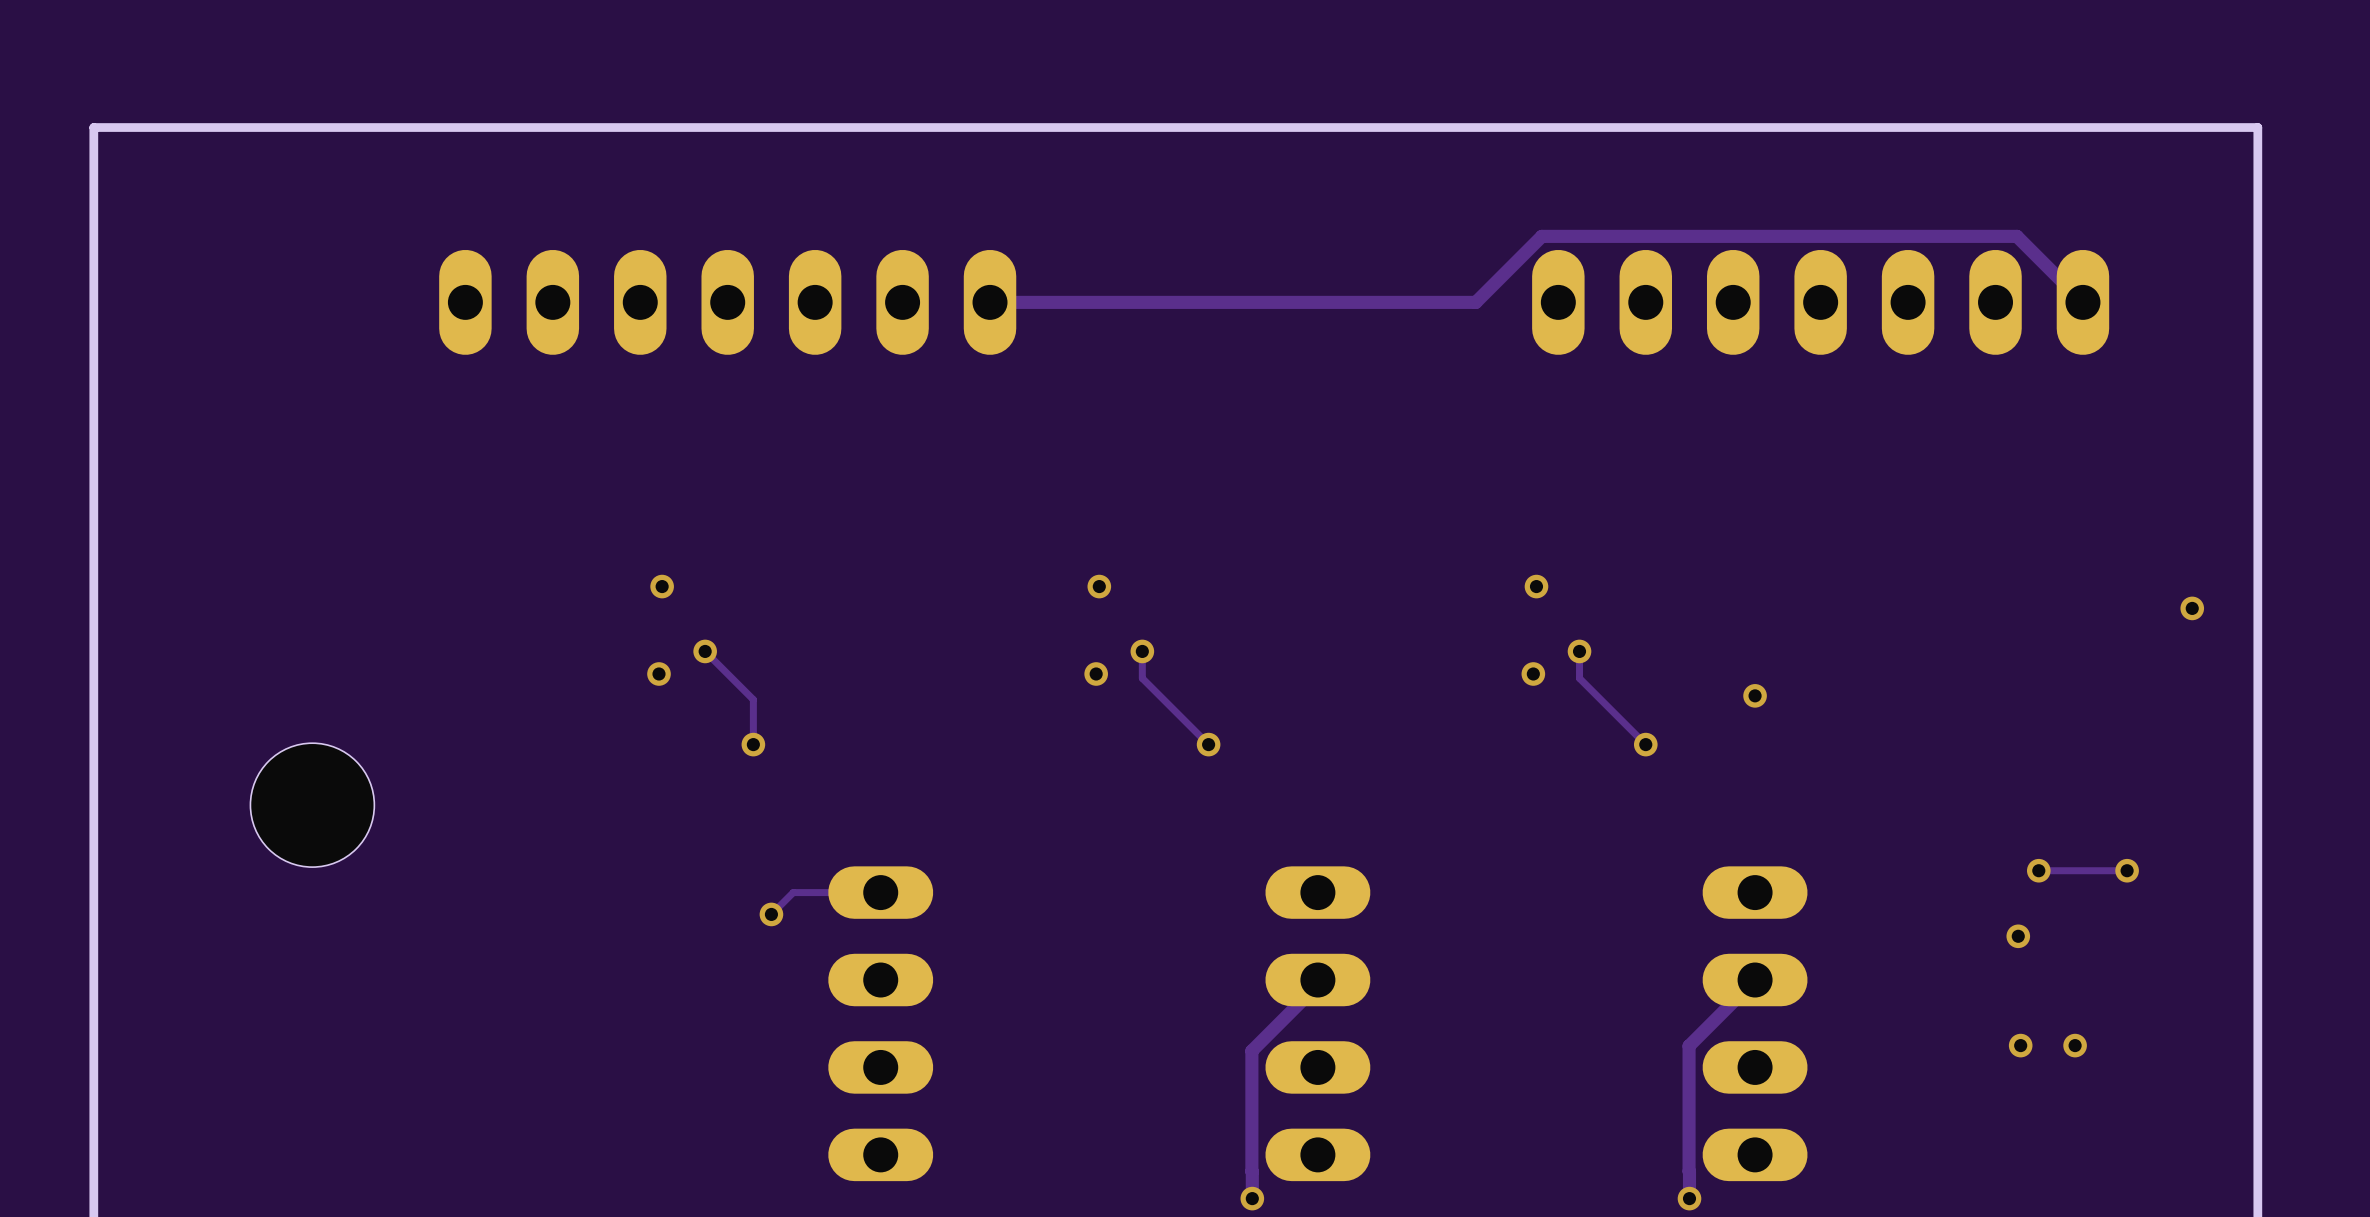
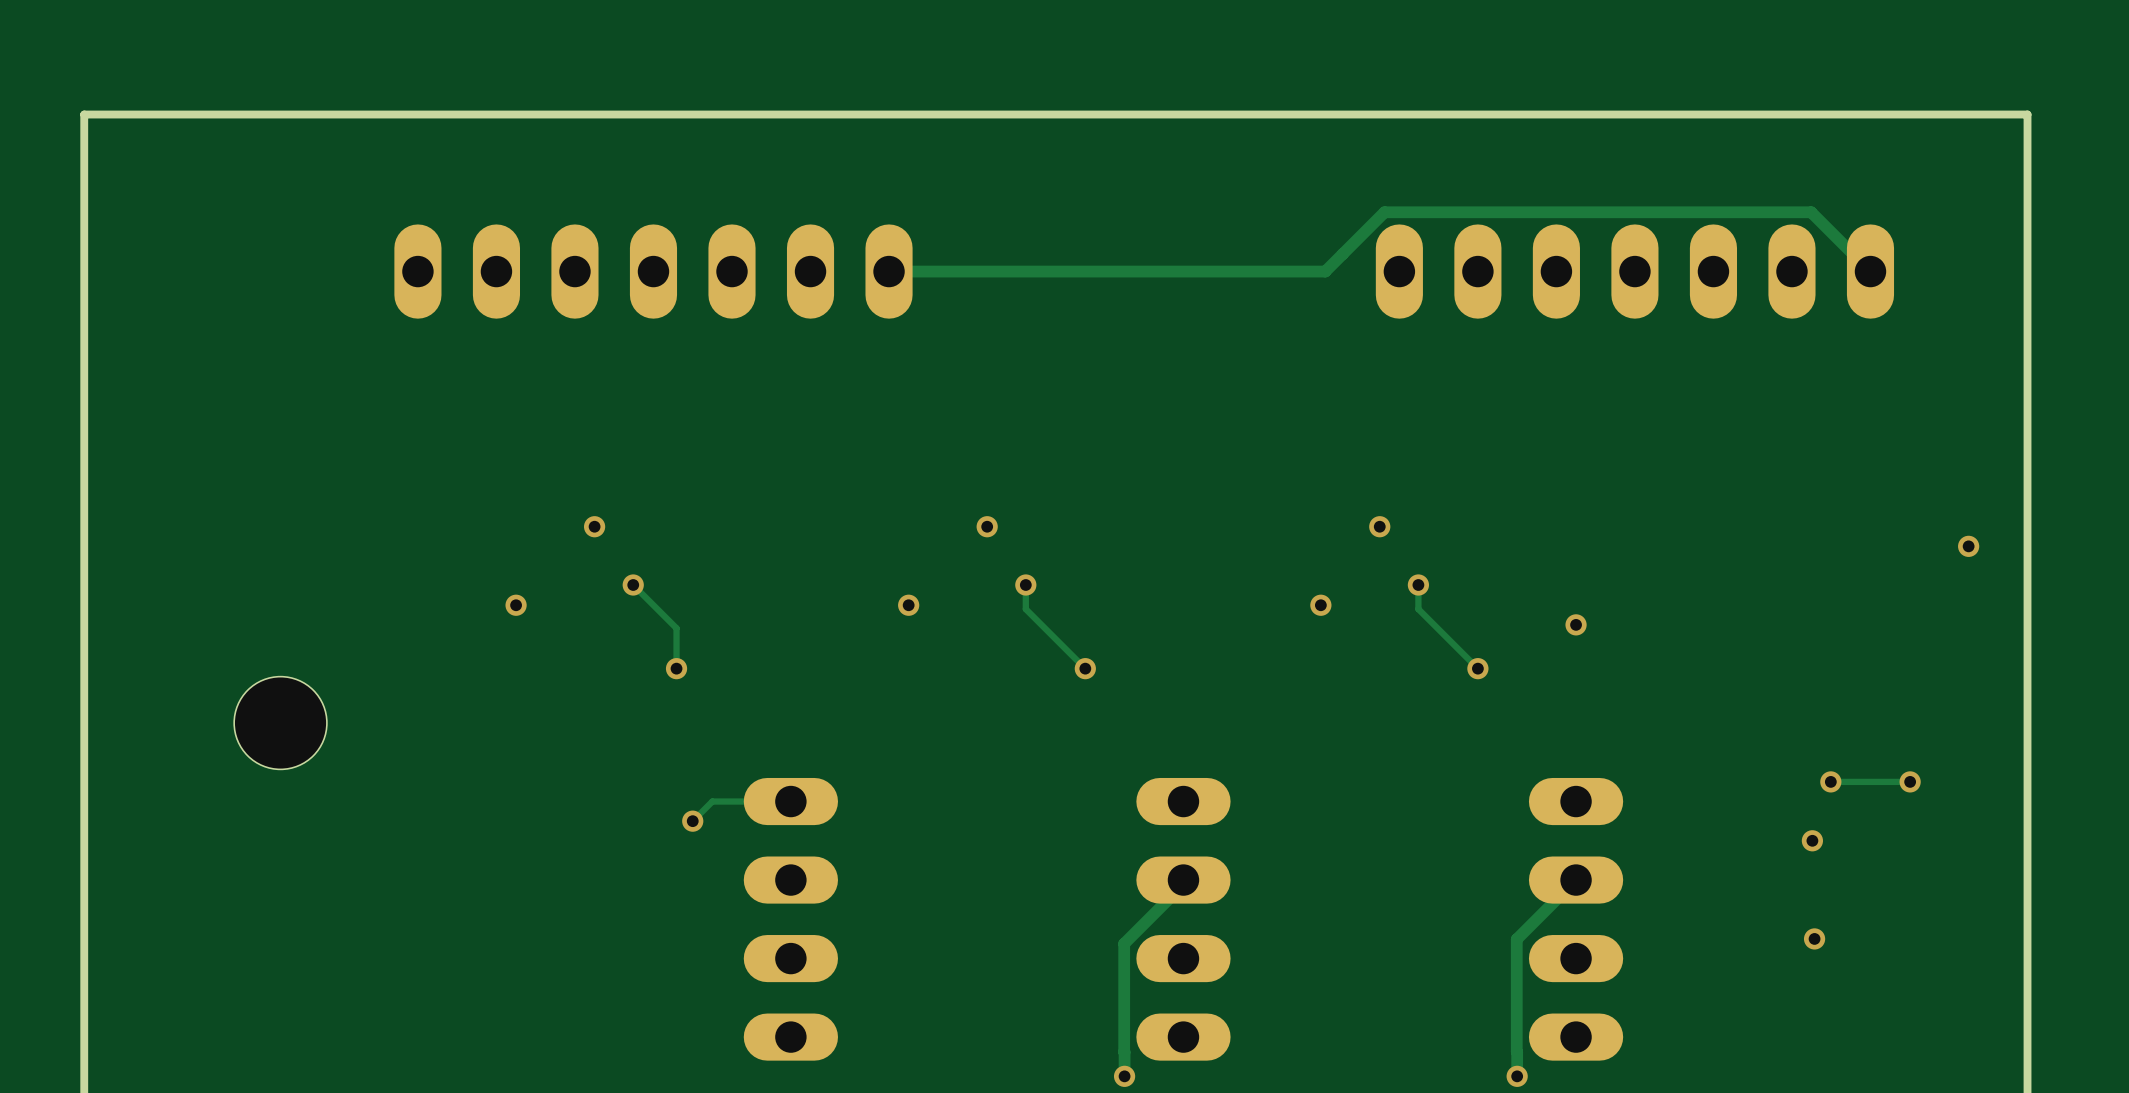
via position: (659, 673) -> (516, 605)
via position: (1096, 673) -> (908, 605)
via position: (1533, 673) -> (1320, 605)
part footprint: [250, 743, 375, 868] -> [234, 676, 327, 770]
via: (2075, 1045) -> none

